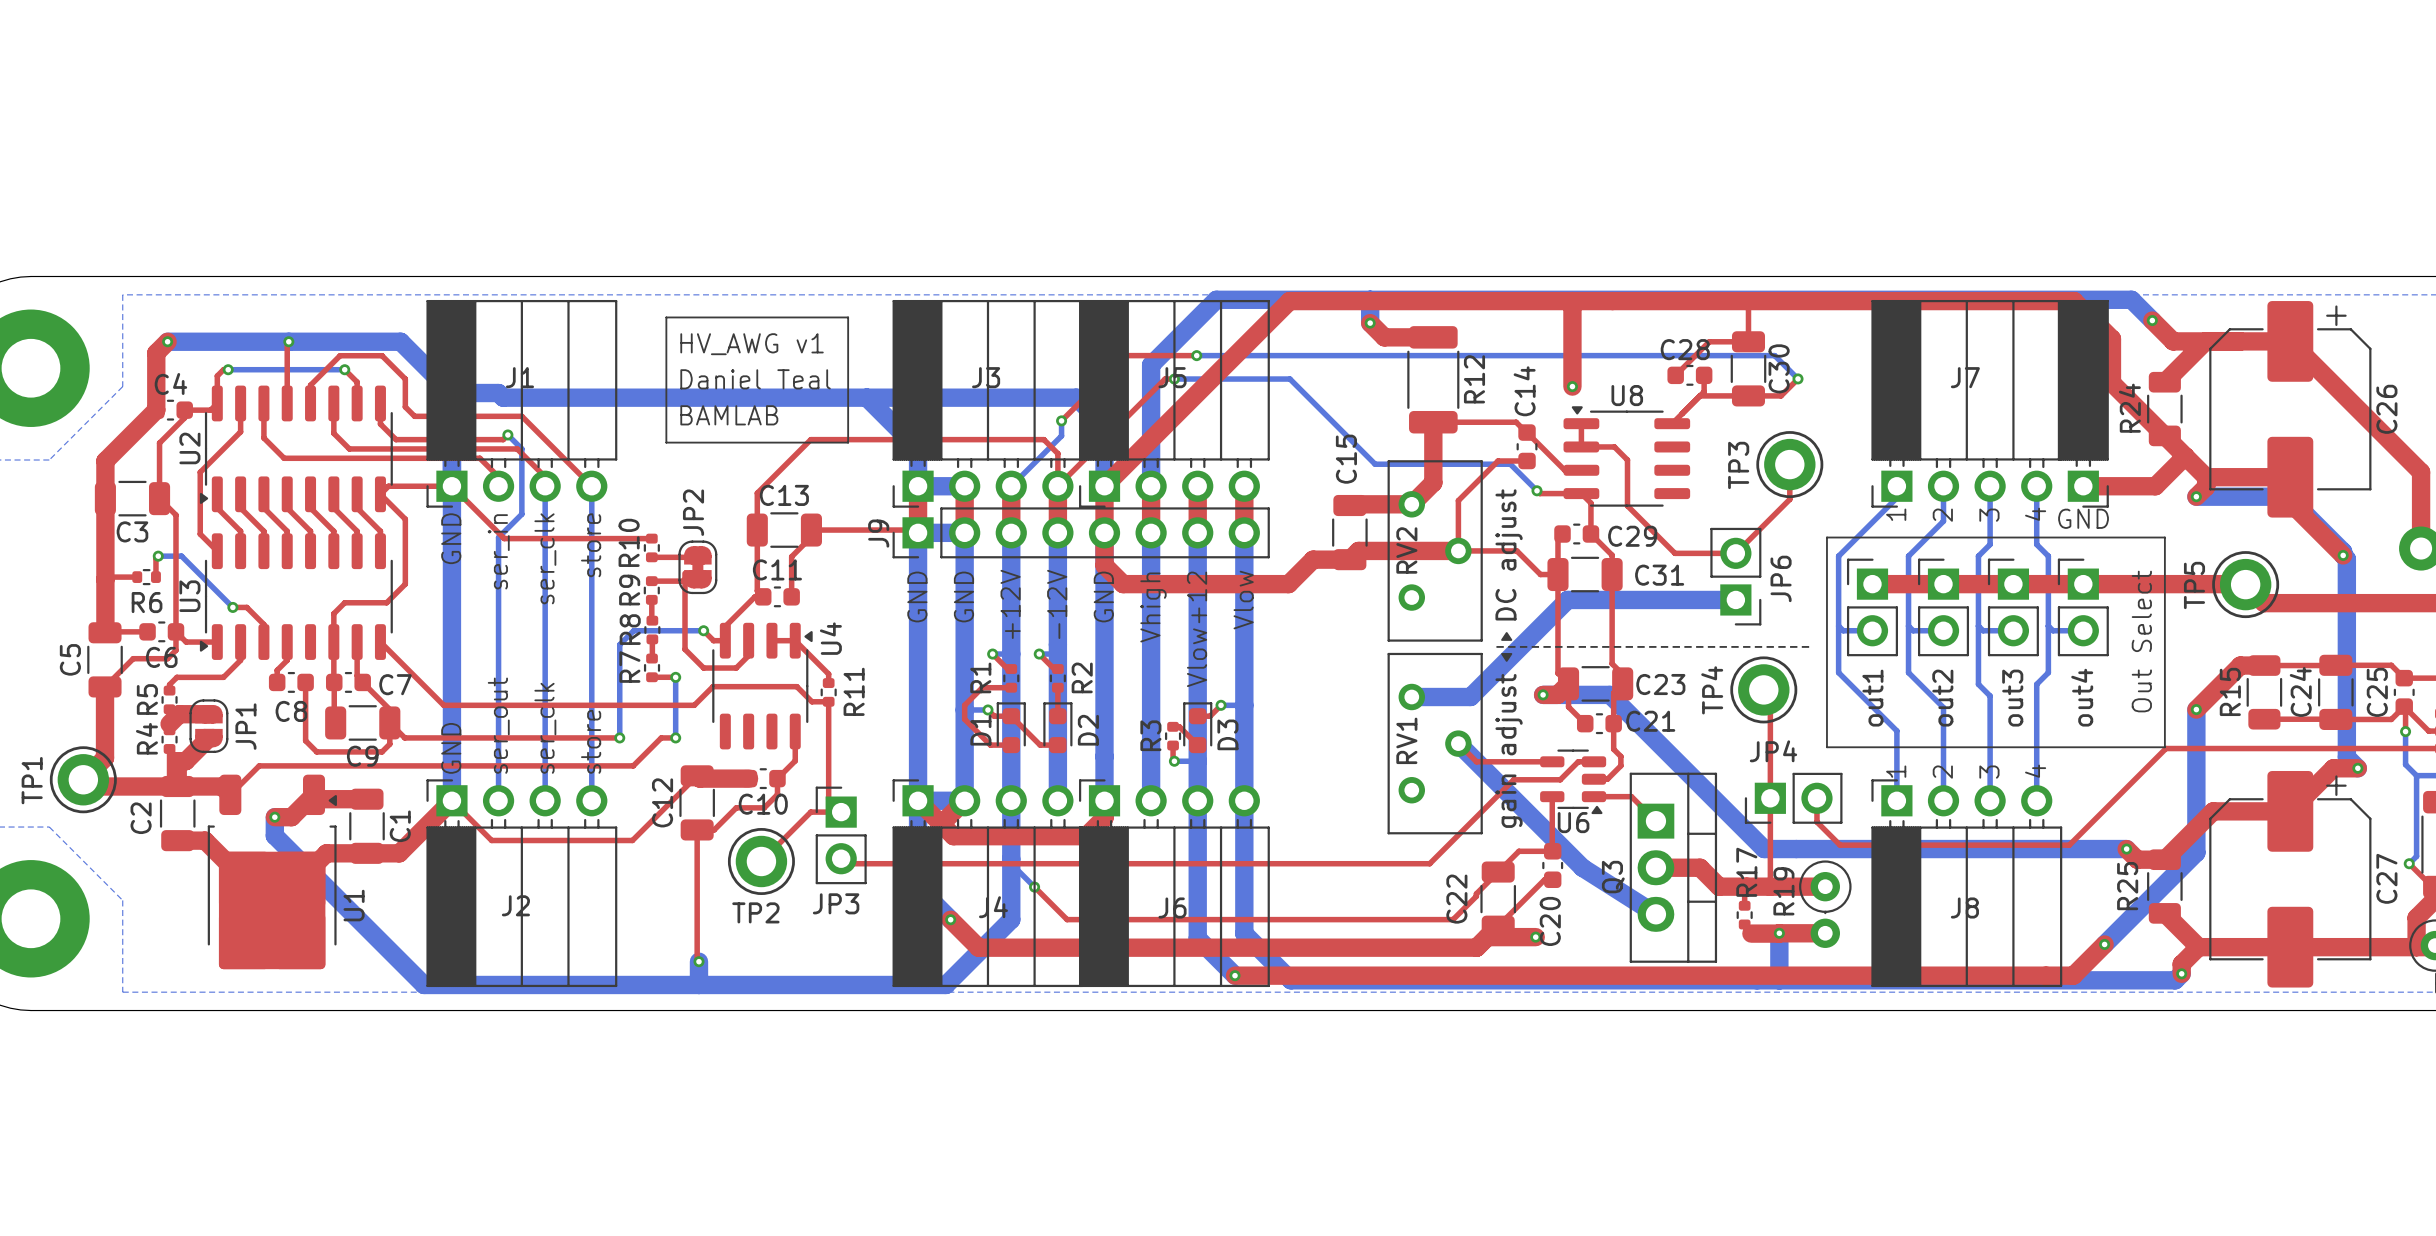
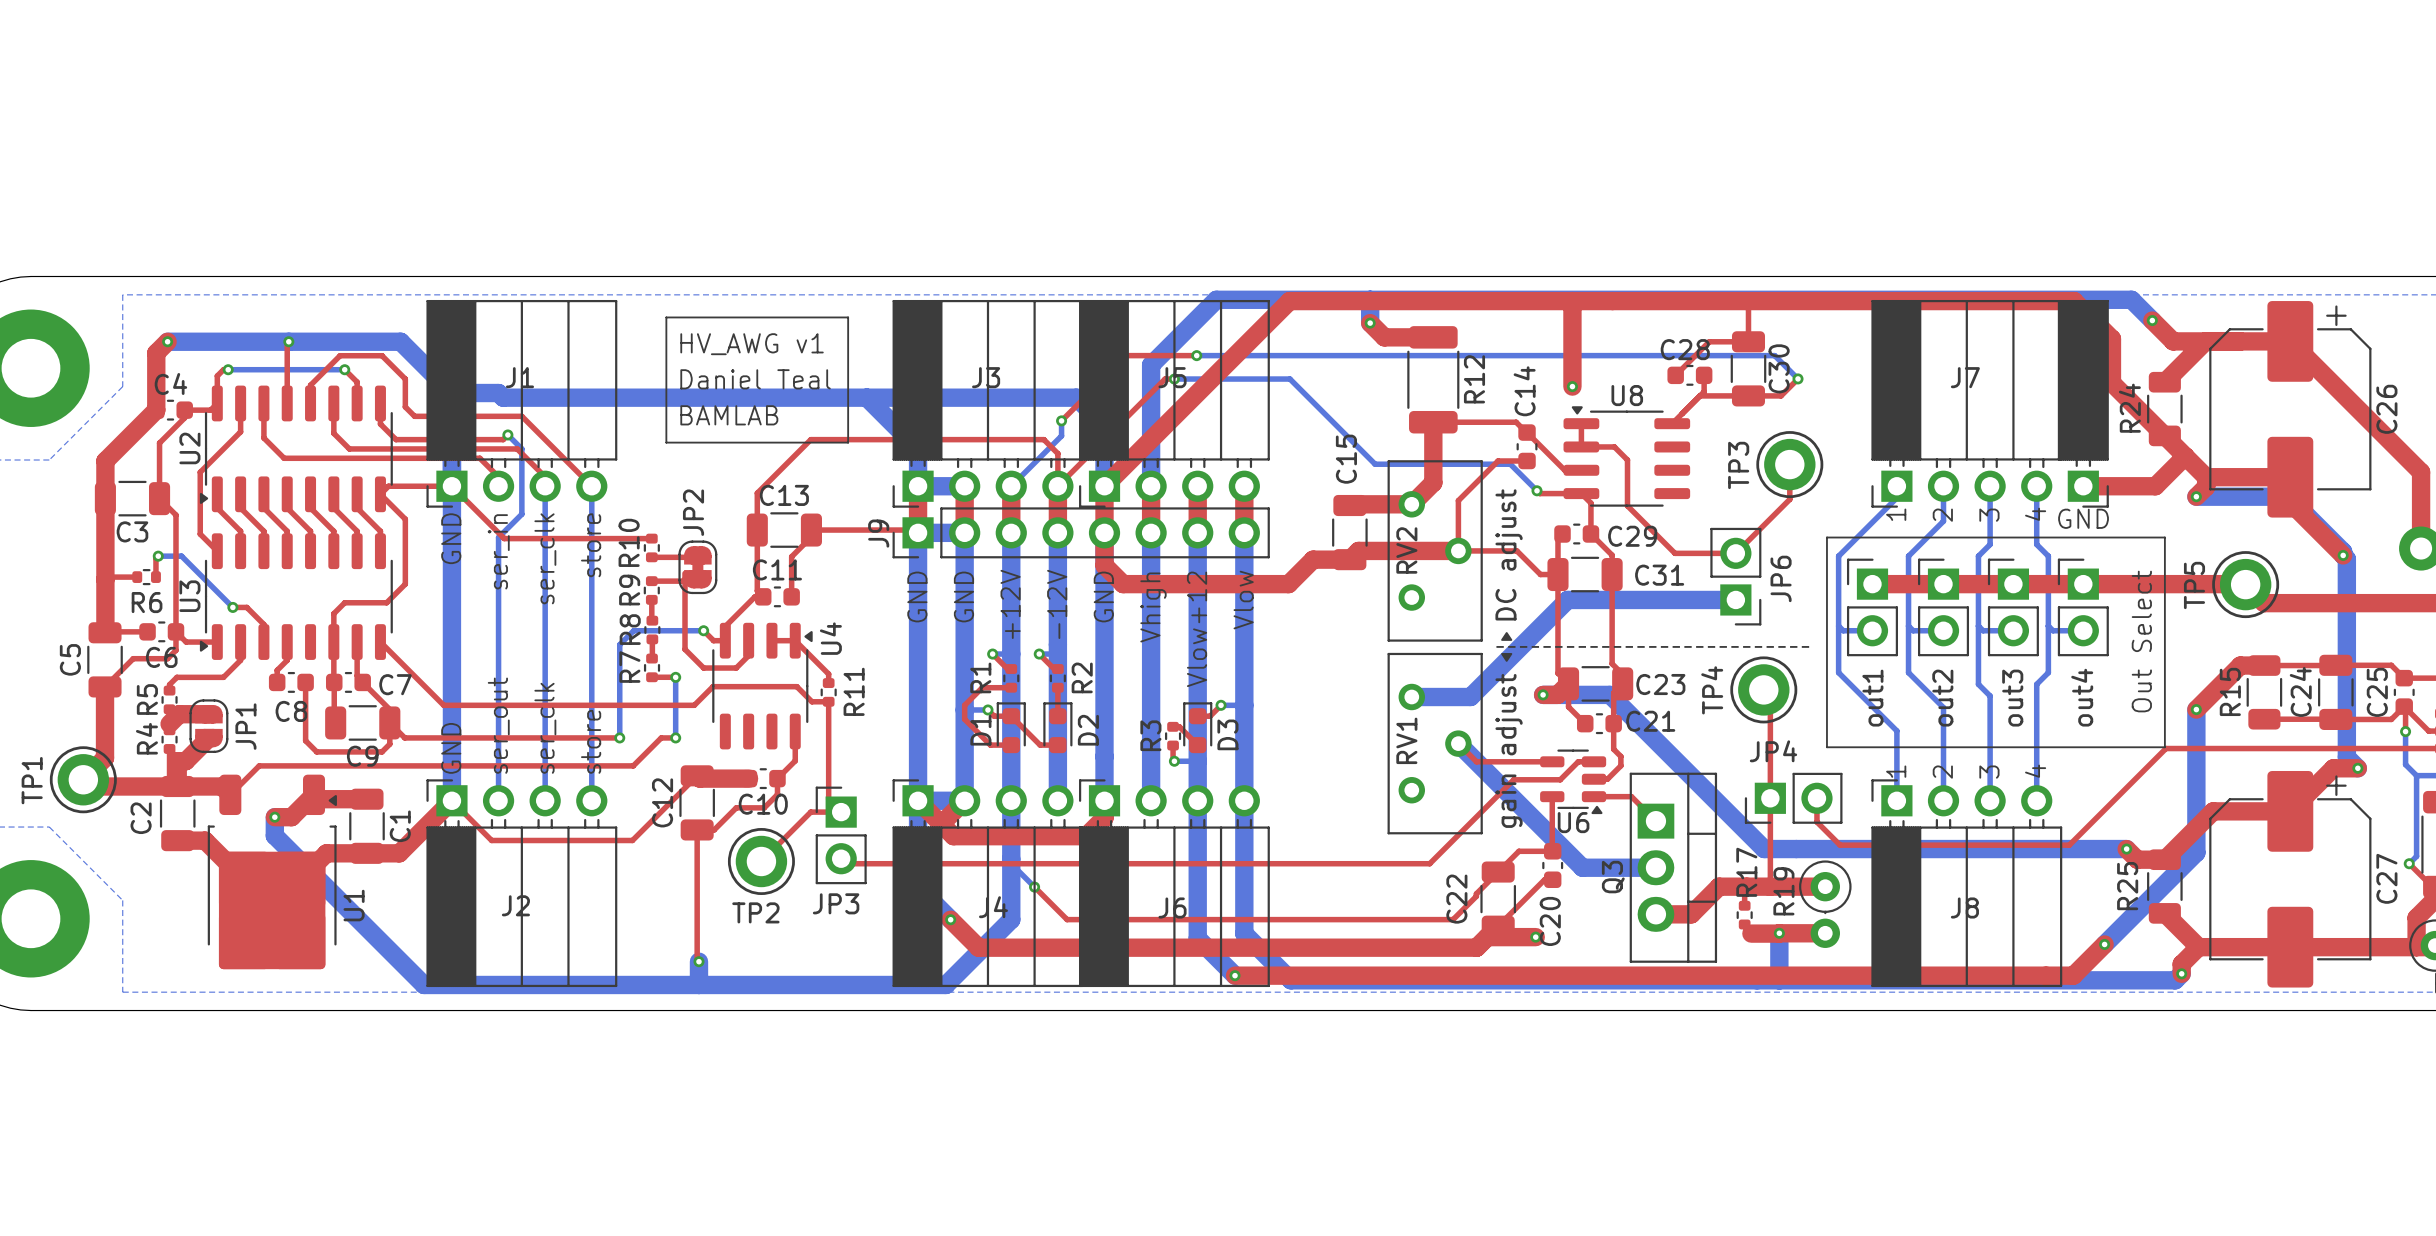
bottom track: (1582, 867) (1655, 914) -> (1582, 867) (1655, 867)
top track: (1655, 867) (1700, 867) (1719, 886) -> (1655, 914) (1691, 914) (1719, 886)

